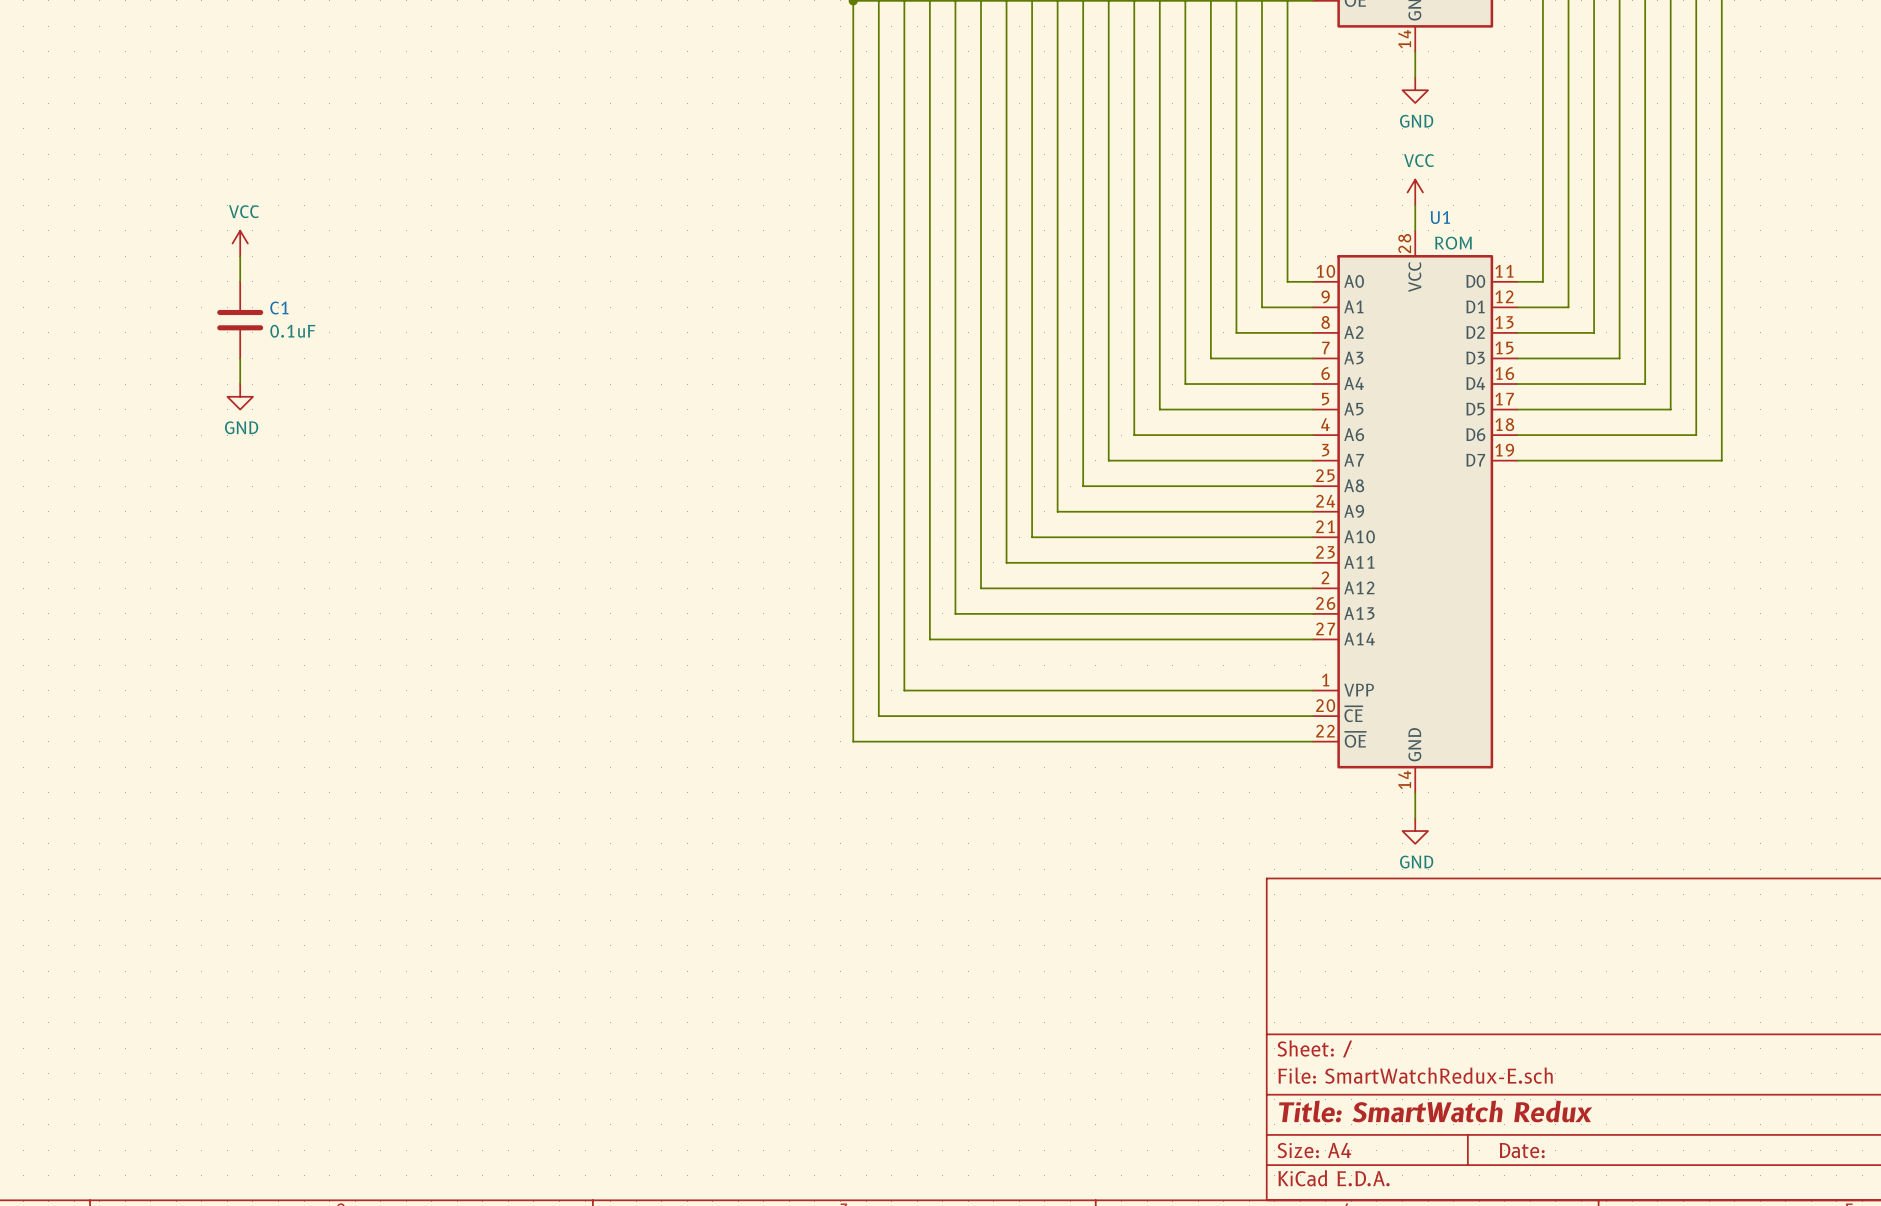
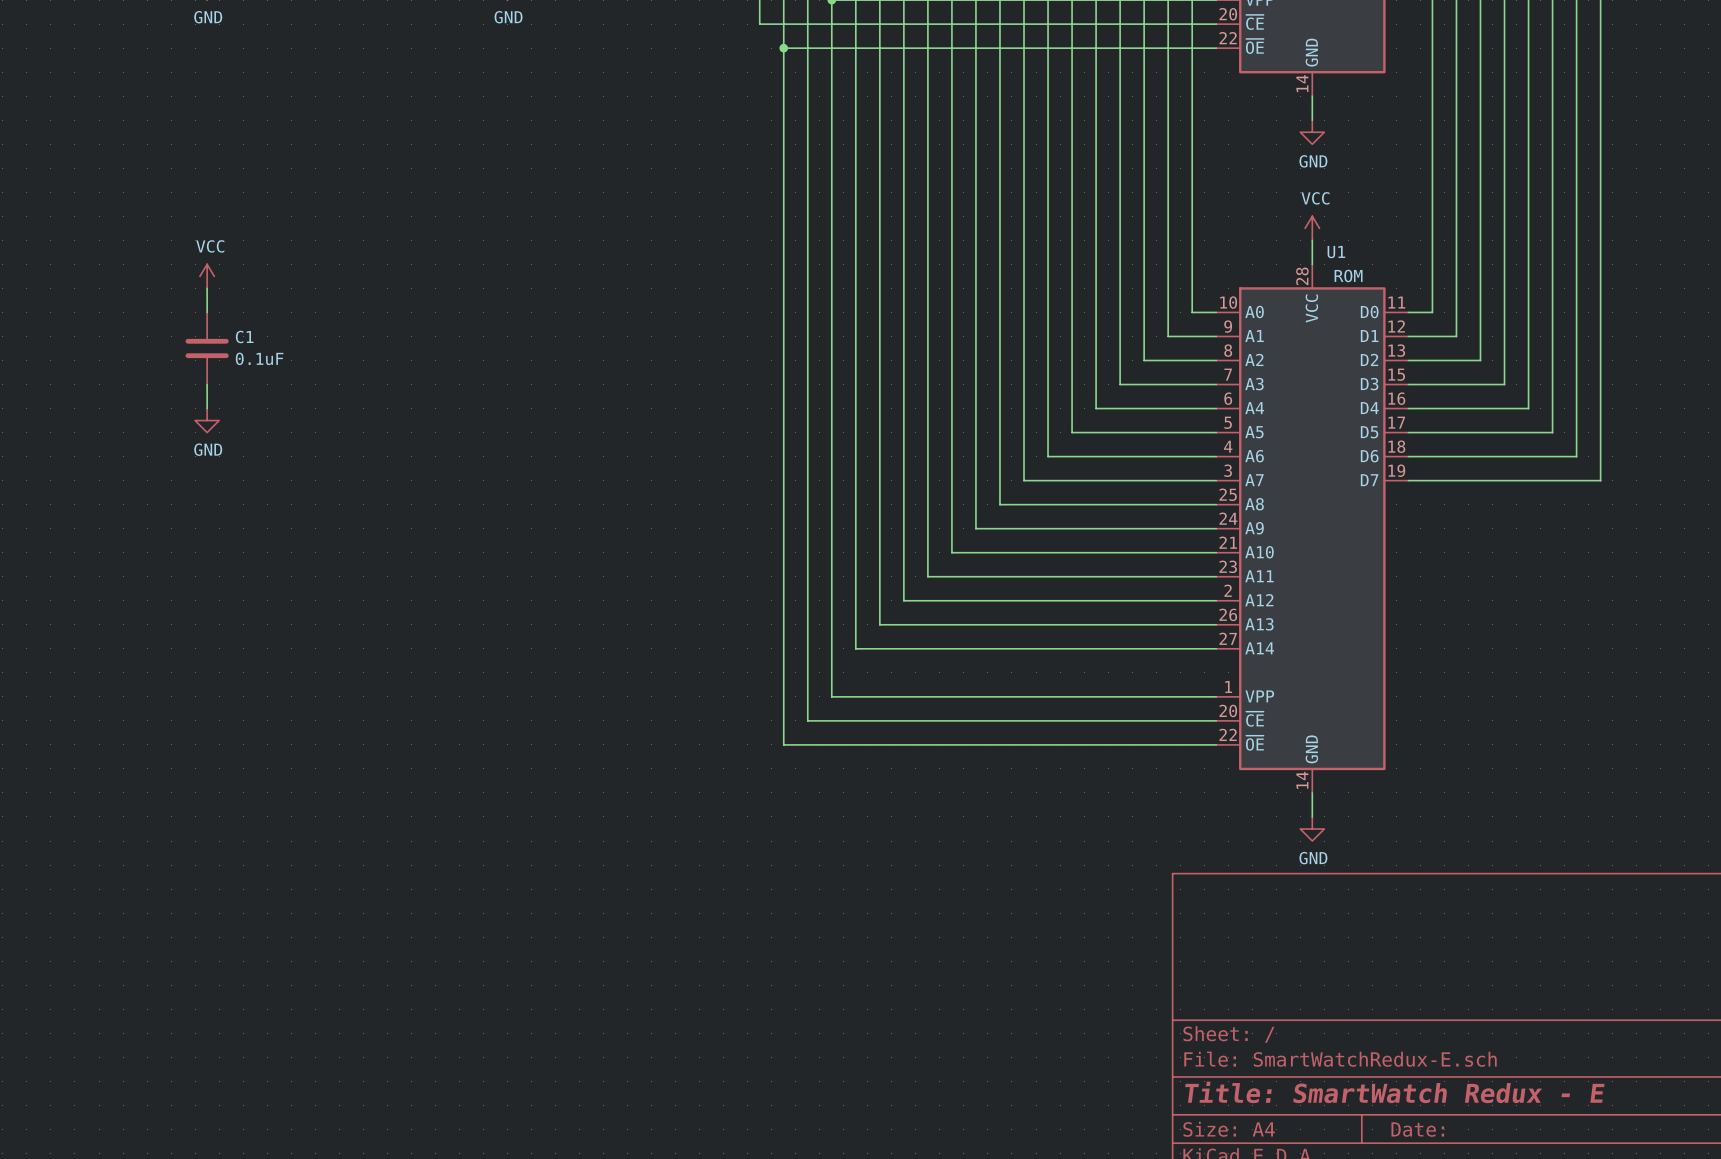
title block: Title: SmartWatch Redux (1435, 1111) -> Title: SmartWatch Redux - E (1394, 1092)

